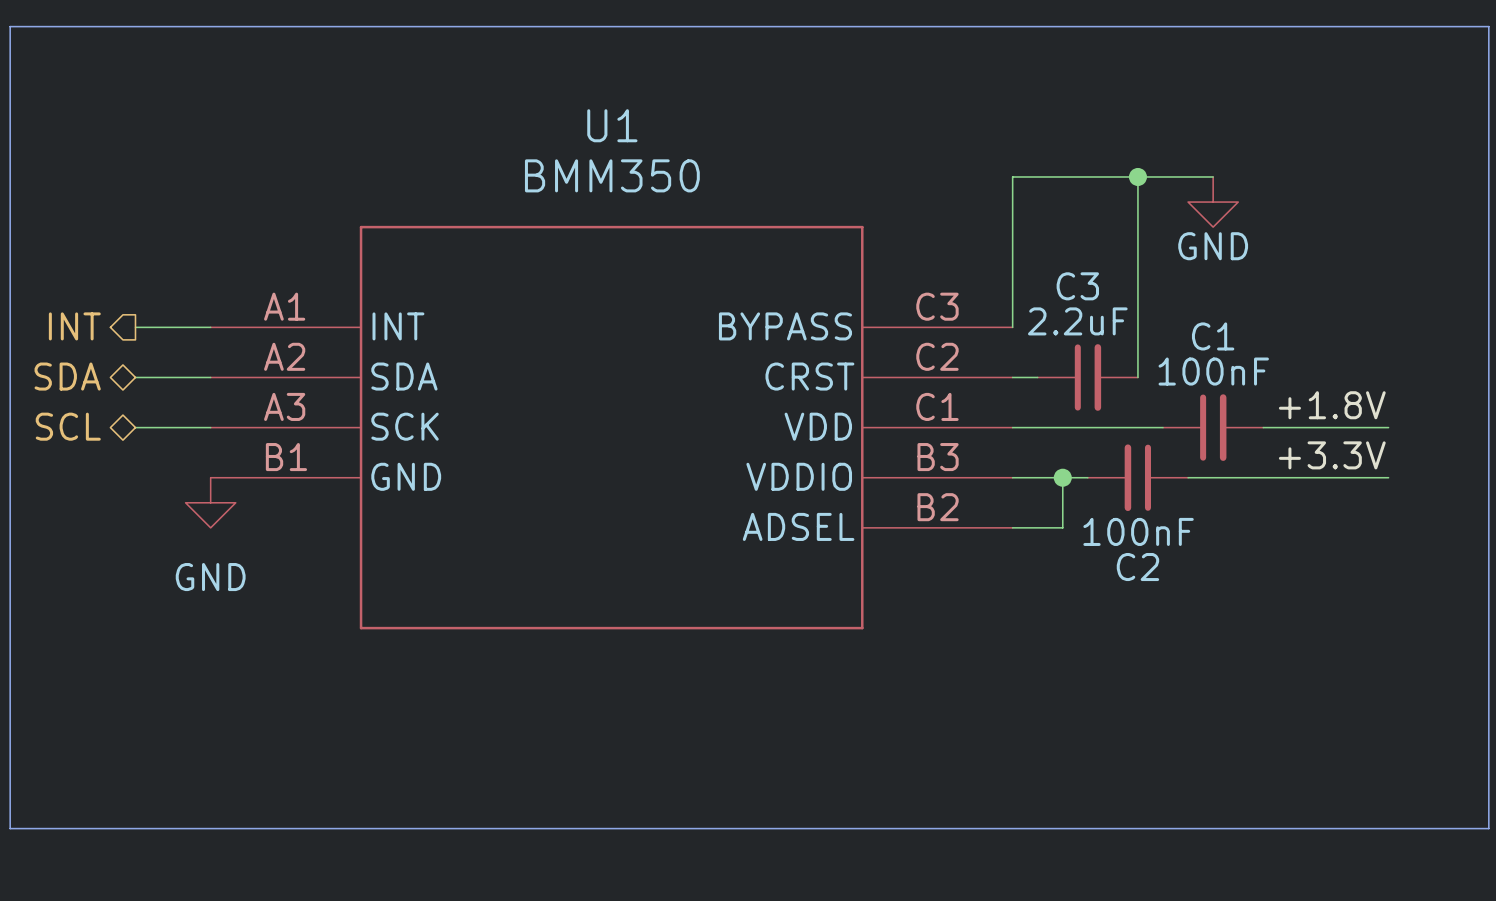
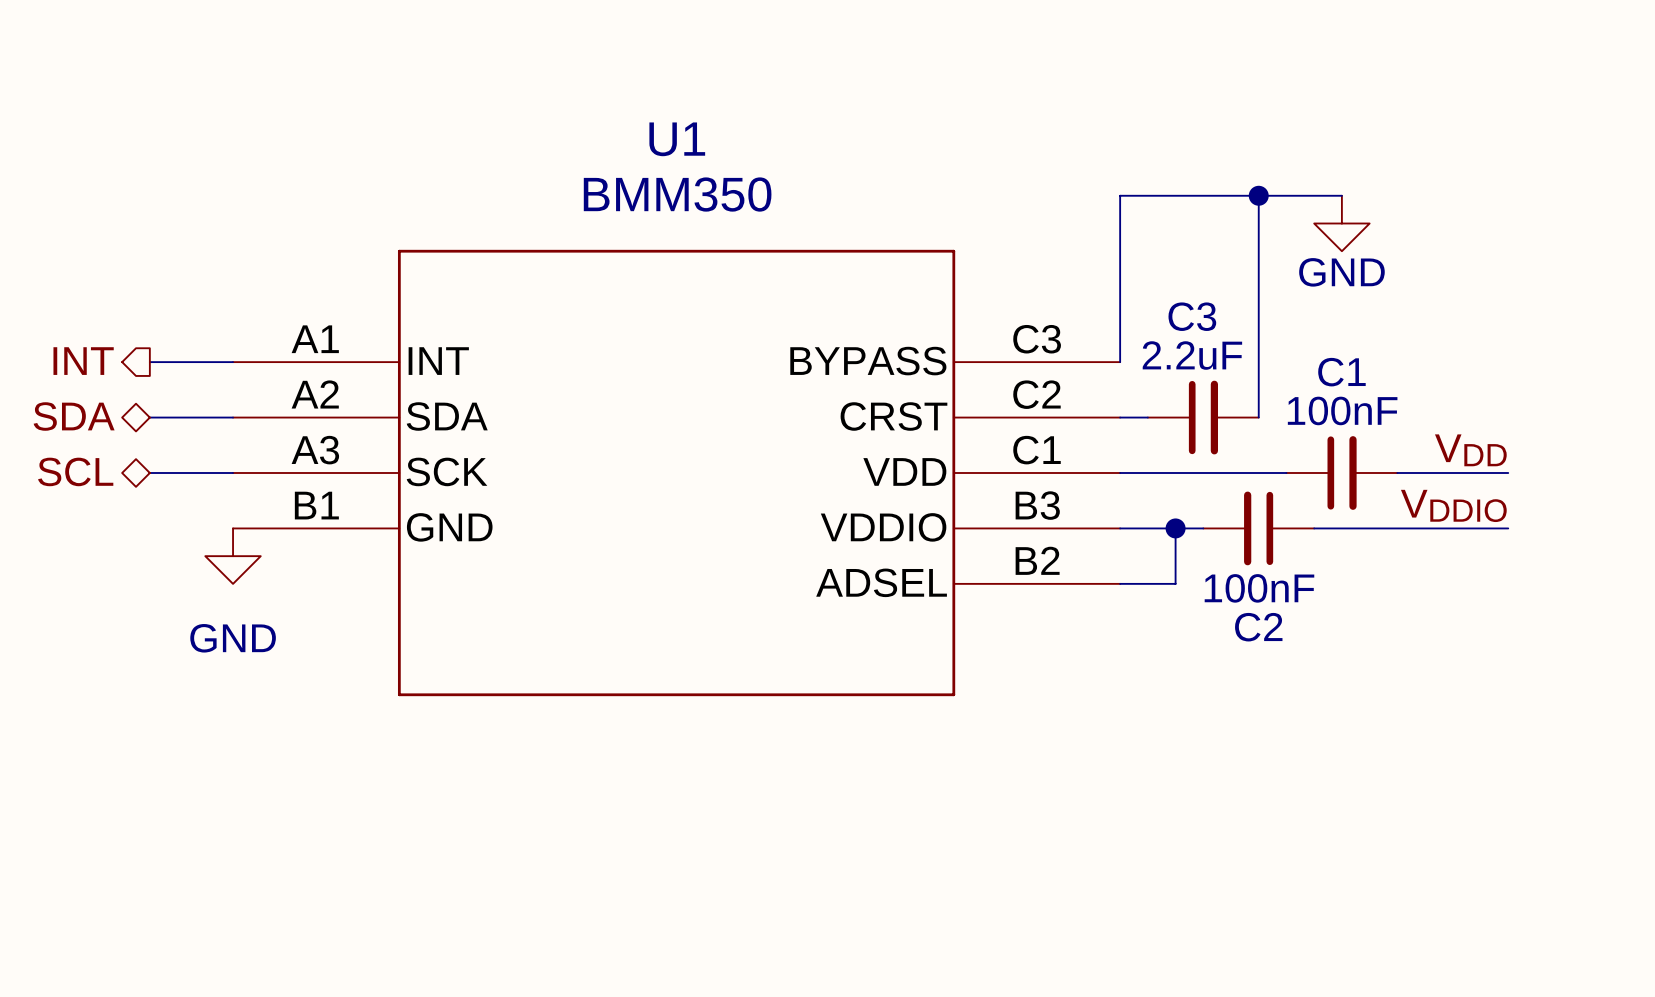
line: (10, 26) (10, 828) (1488, 828) (1488, 26) (10, 26) -> none
label: +1.8V (1332, 405) -> none
label: none -> VDD (1470, 450)
wire: (1363, 427) (1388, 427) -> none
label: +3.3V (1332, 455) -> none
label: none -> VDDIO (1453, 505)
wire: (1363, 477) (1388, 477) -> none

